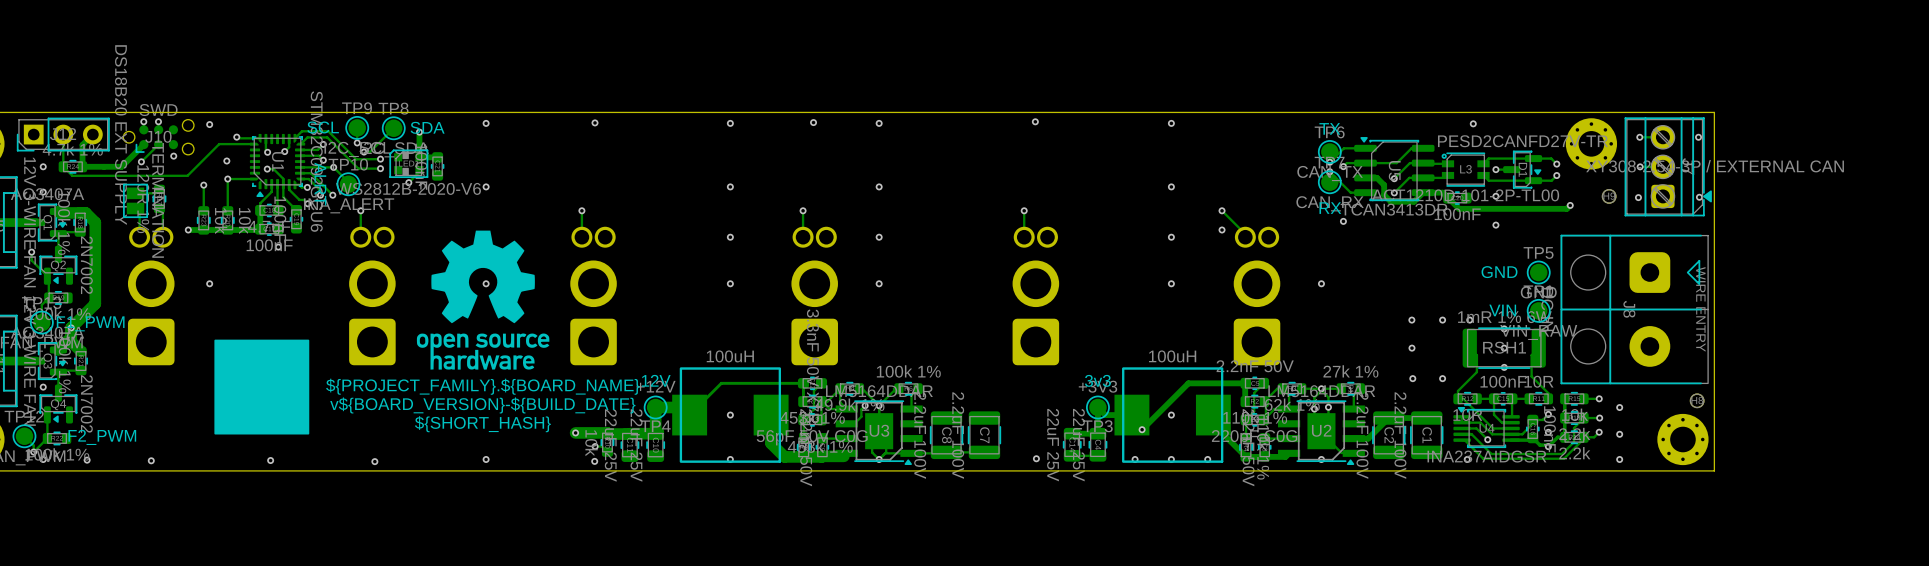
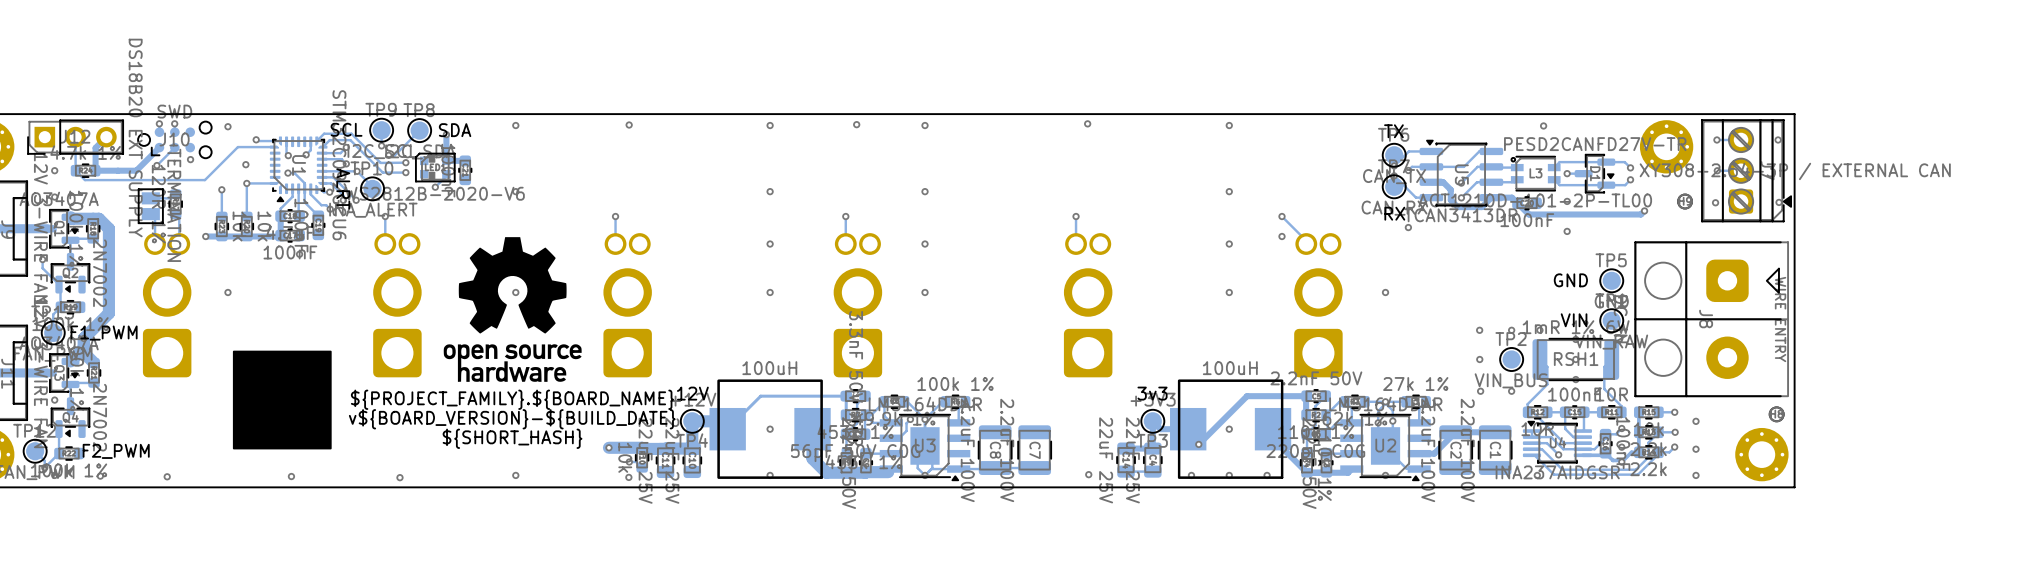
TP2: none -> VIN_BUS (1511, 359)

